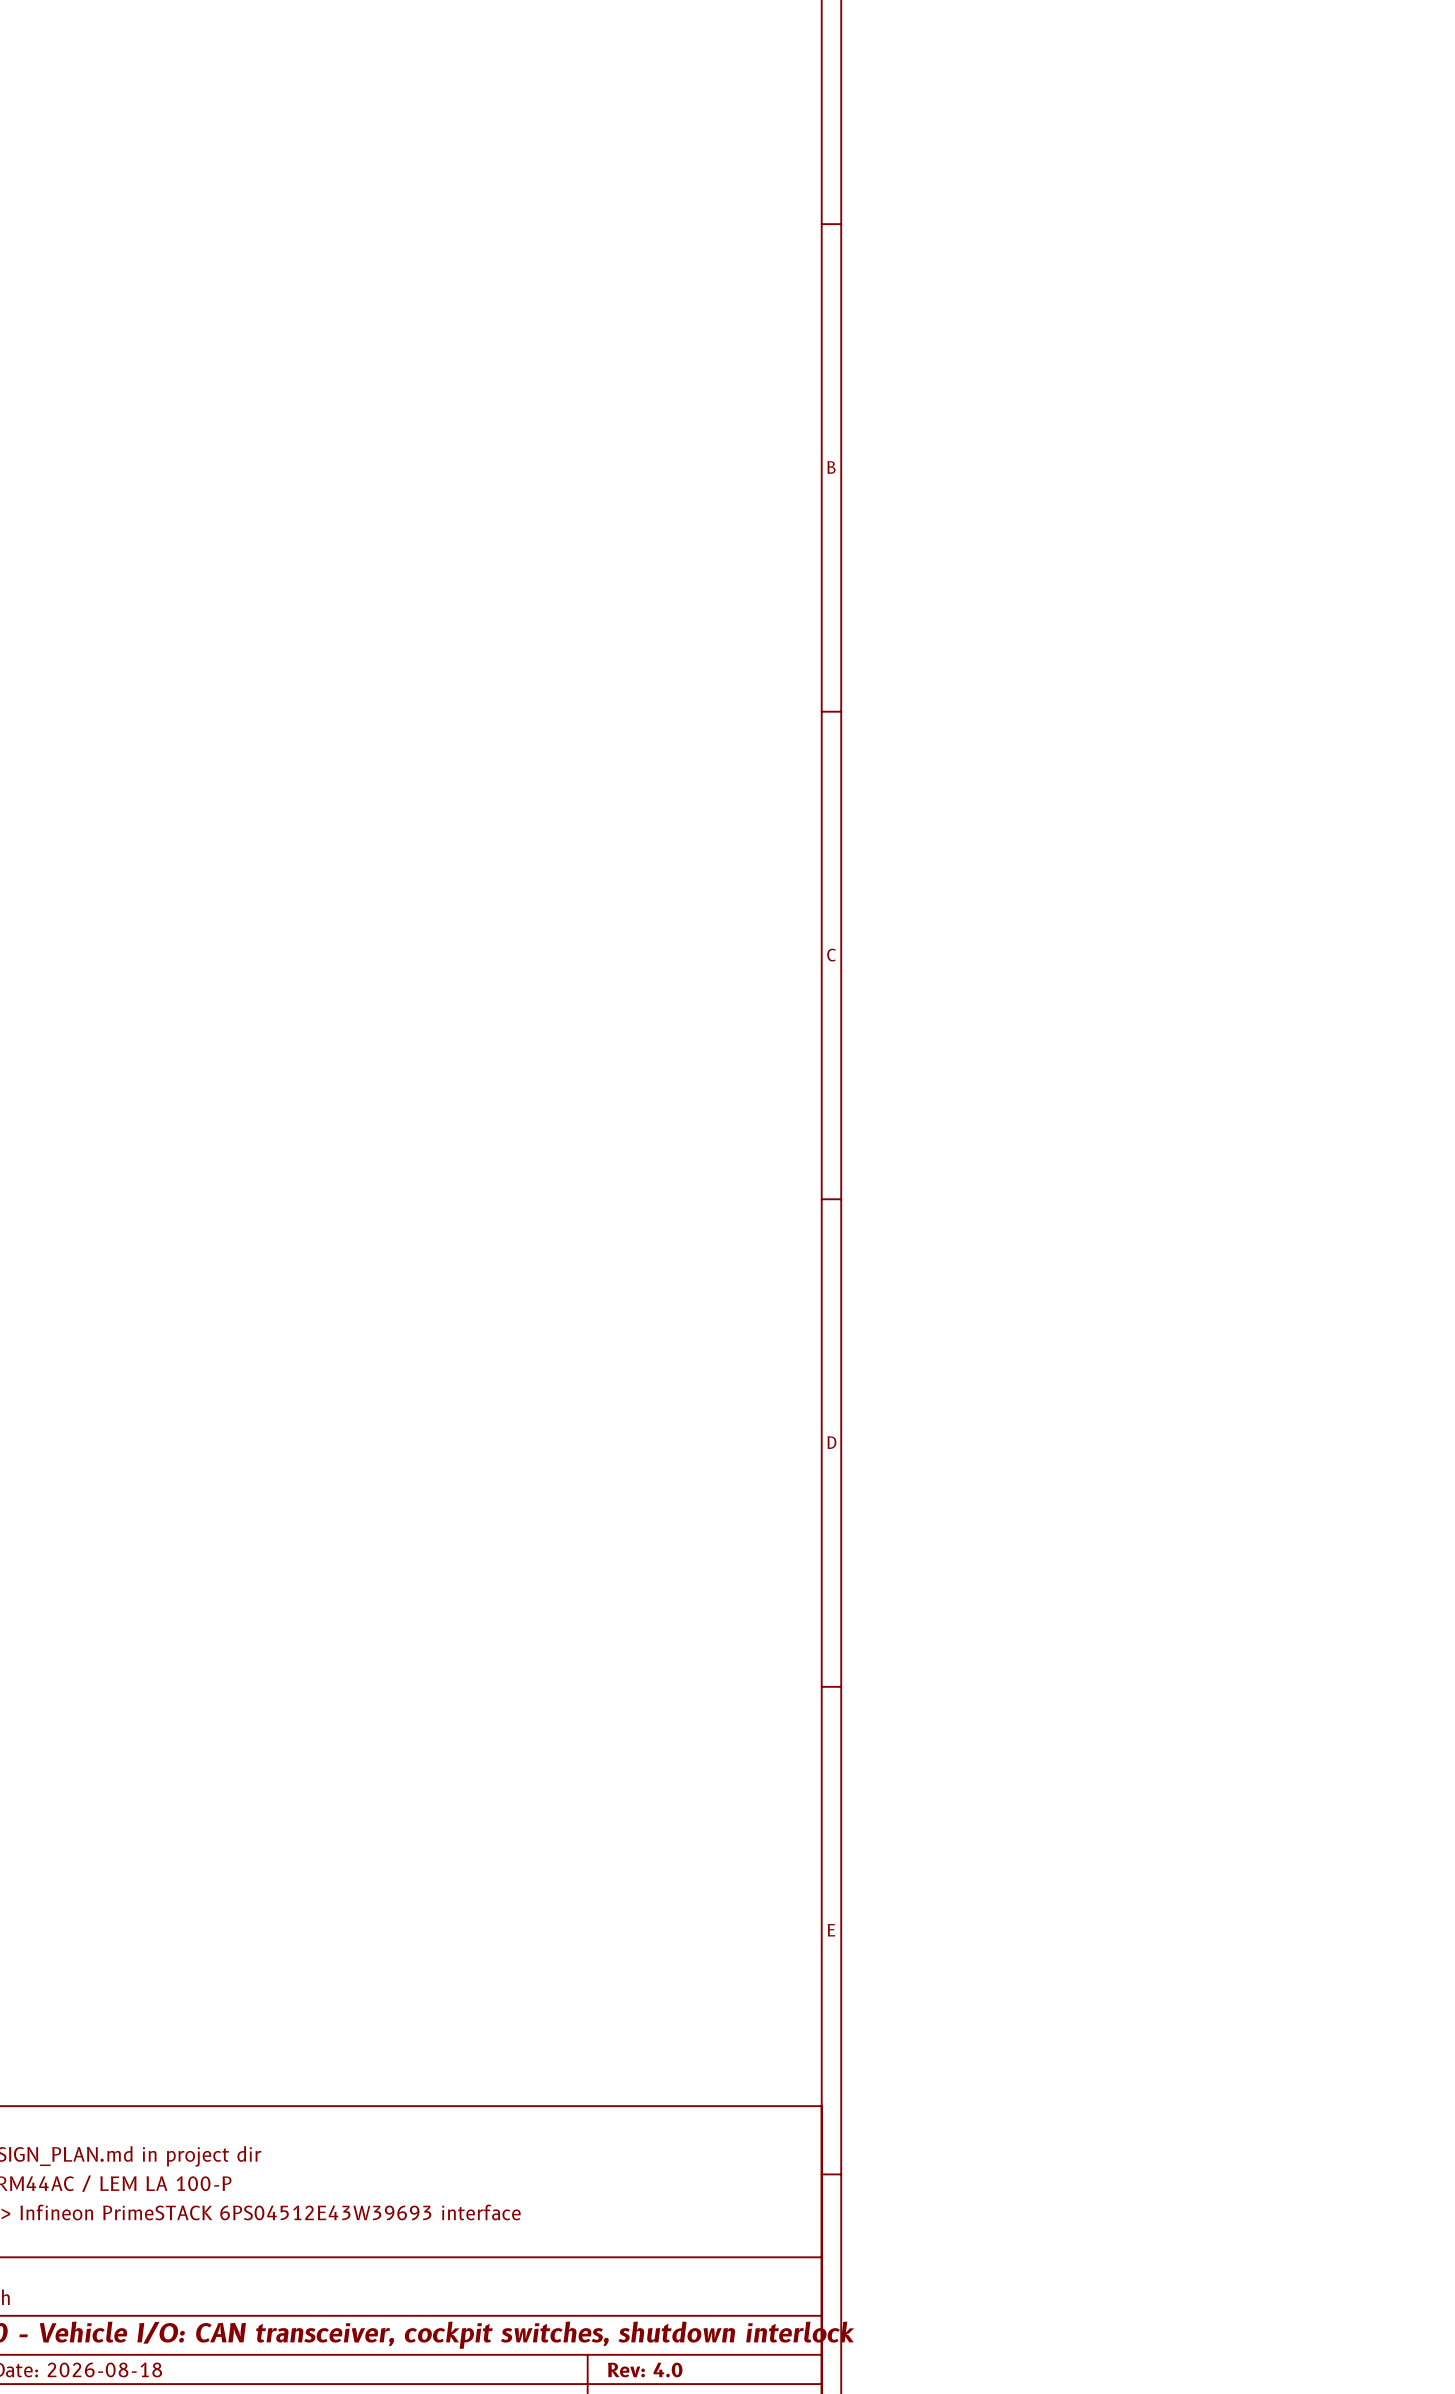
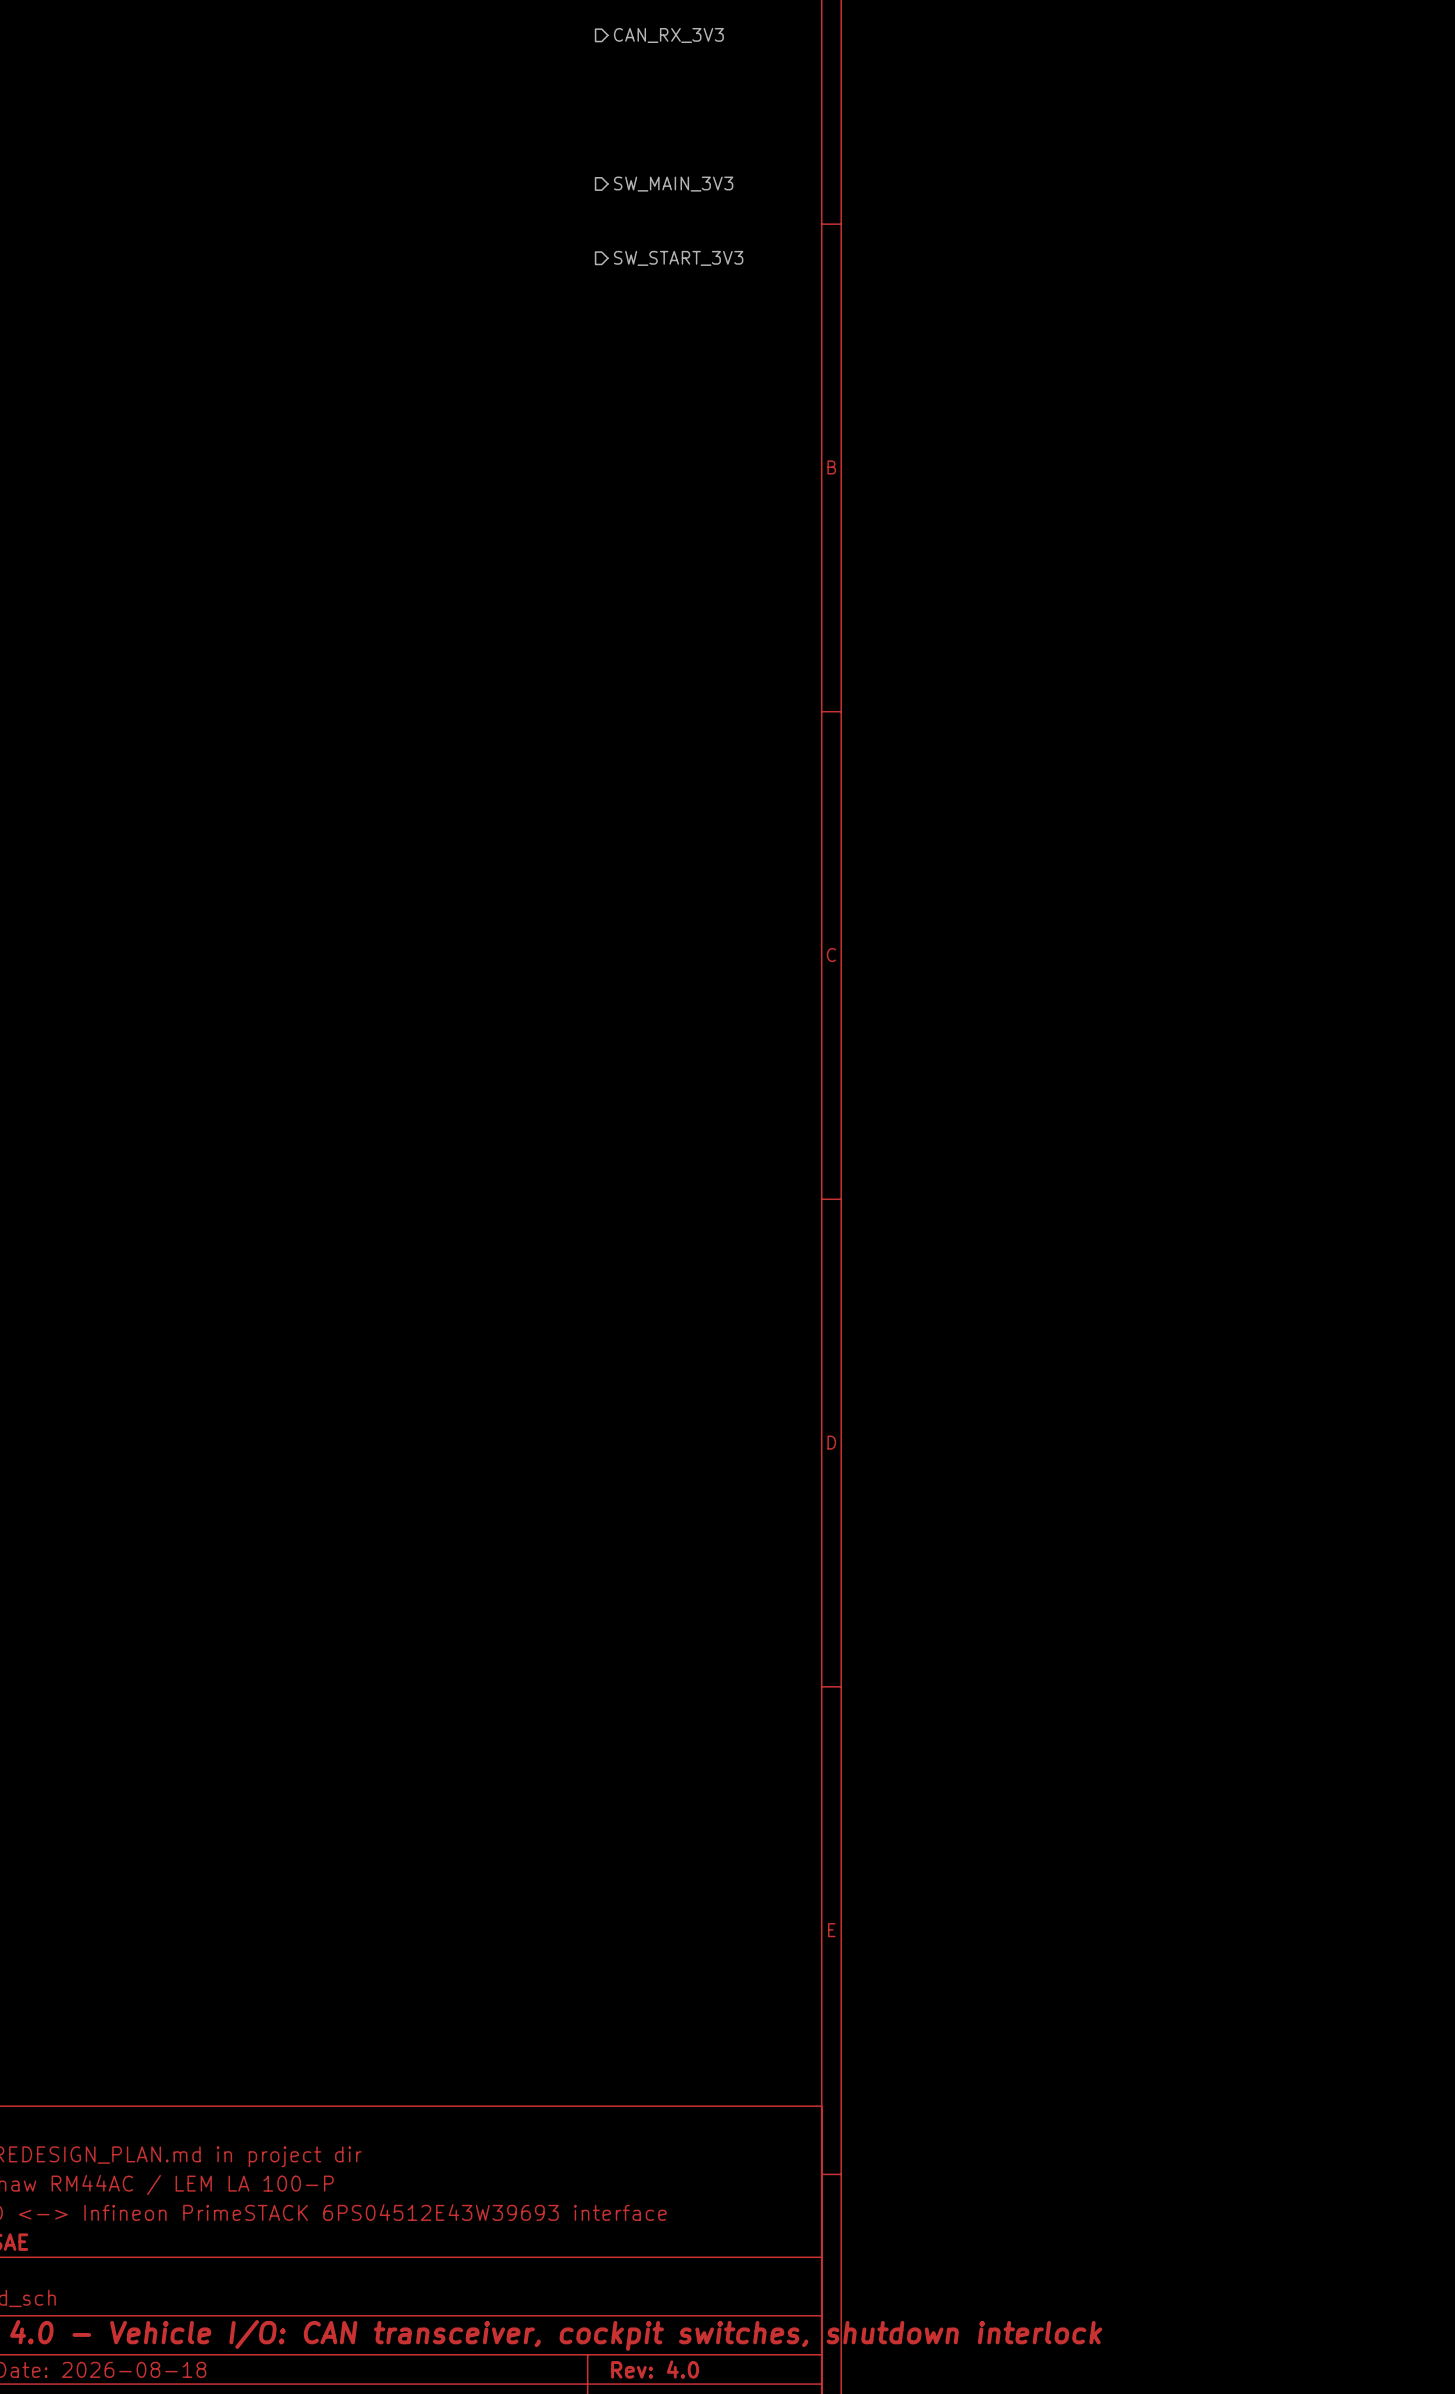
hierarchical label: none -> CAN_RX_3V3 (668, 35)
hierarchical label: none -> SW_MAIN_3V3 (673, 184)
hierarchical label: none -> SW_START_3V3 (678, 258)

